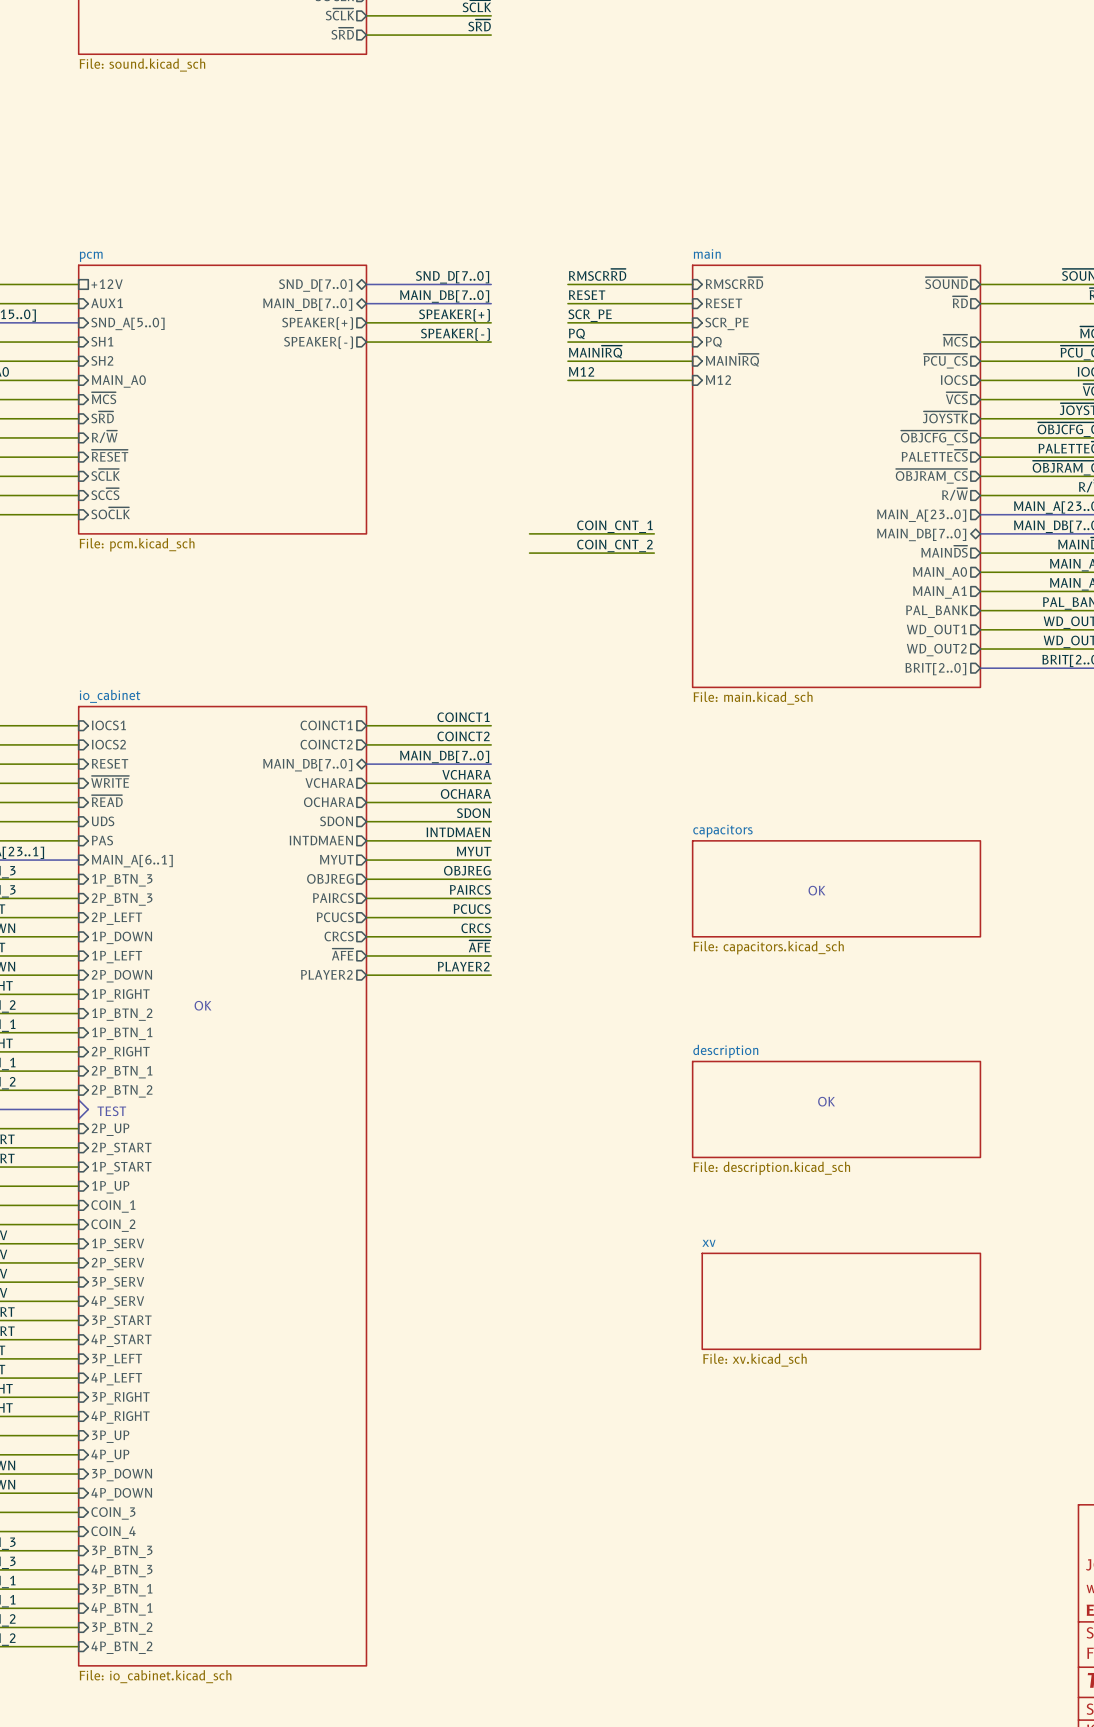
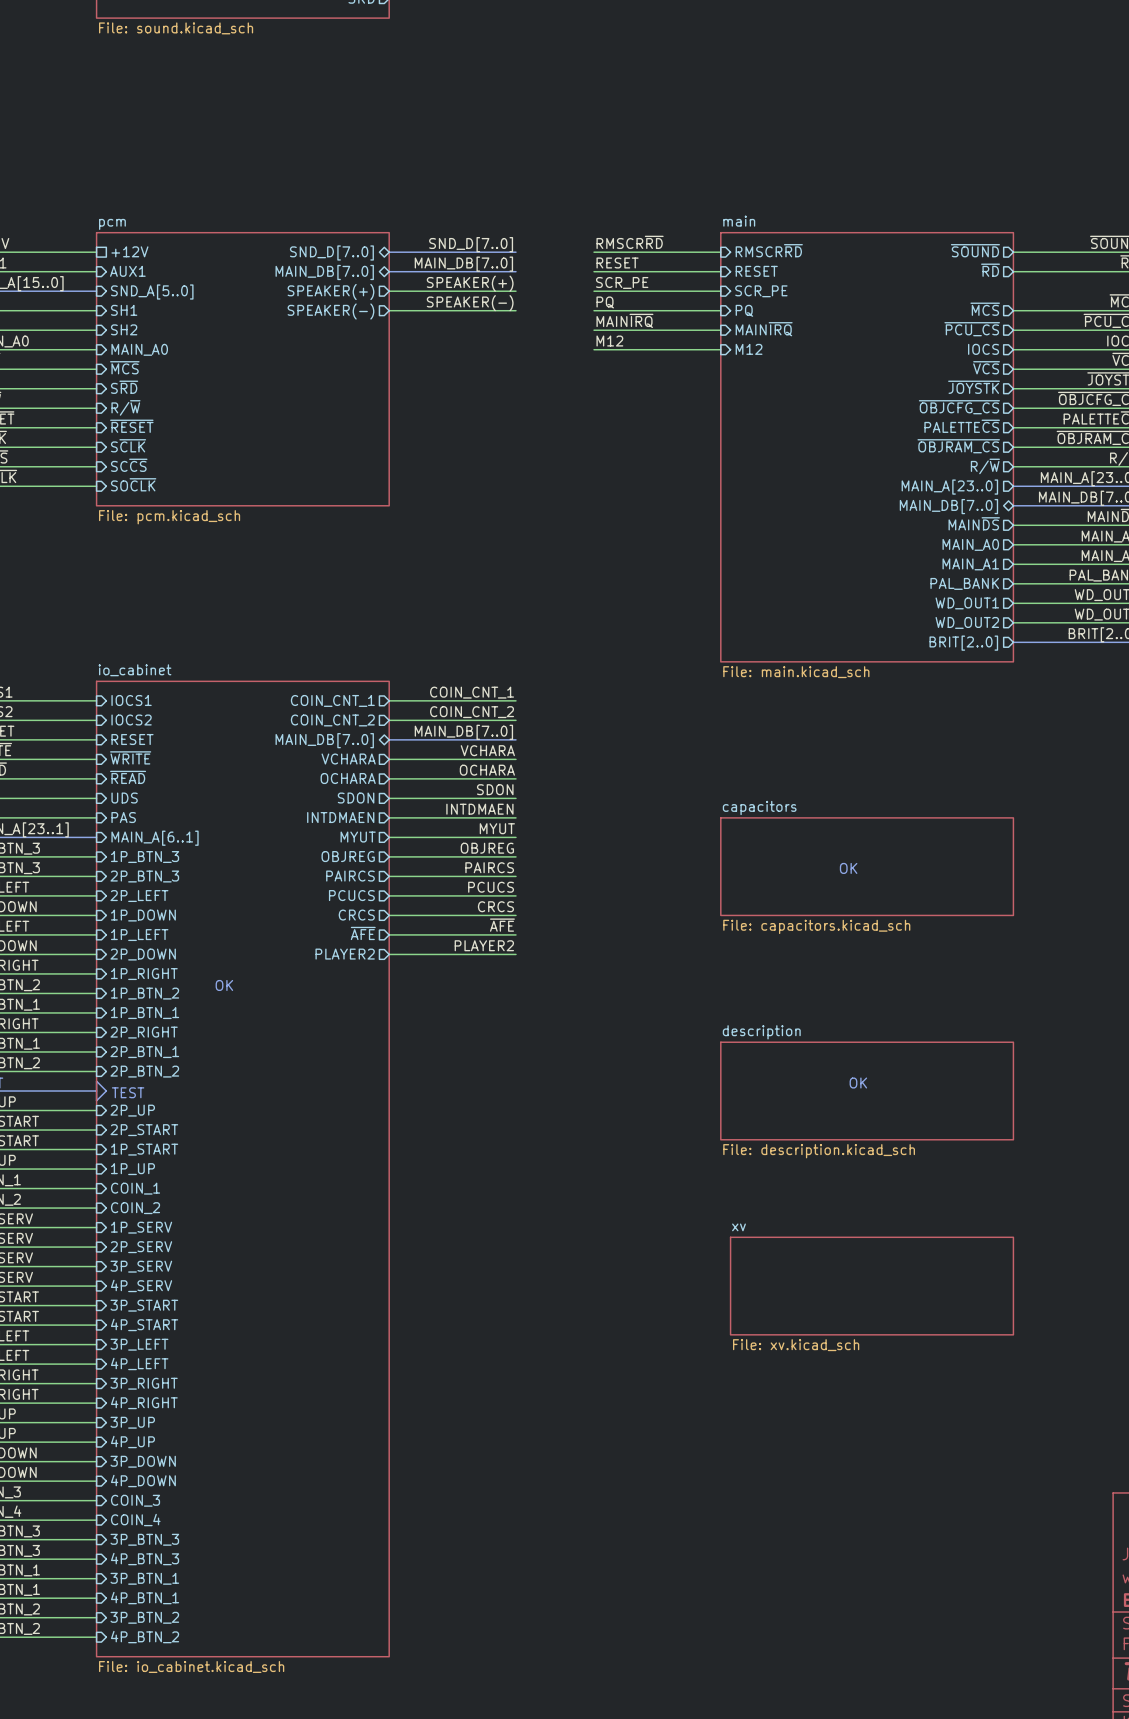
label: COIN_CNT_1 (614, 526) -> none
wire: (529, 533) (654, 533) -> none
label: COIN_CNT_2 (614, 545) -> none
wire: (529, 553) (654, 553) -> none
label: COINCT1 (463, 717) -> COIN_CNT_1 (472, 692)
sheet pin: COINCT1 (326, 725) -> COIN_CNT_1 (332, 700)
label: COINCT2 (463, 736) -> COIN_CNT_2 (472, 712)
sheet pin: COINCT2 (326, 744) -> COIN_CNT_2 (332, 720)

